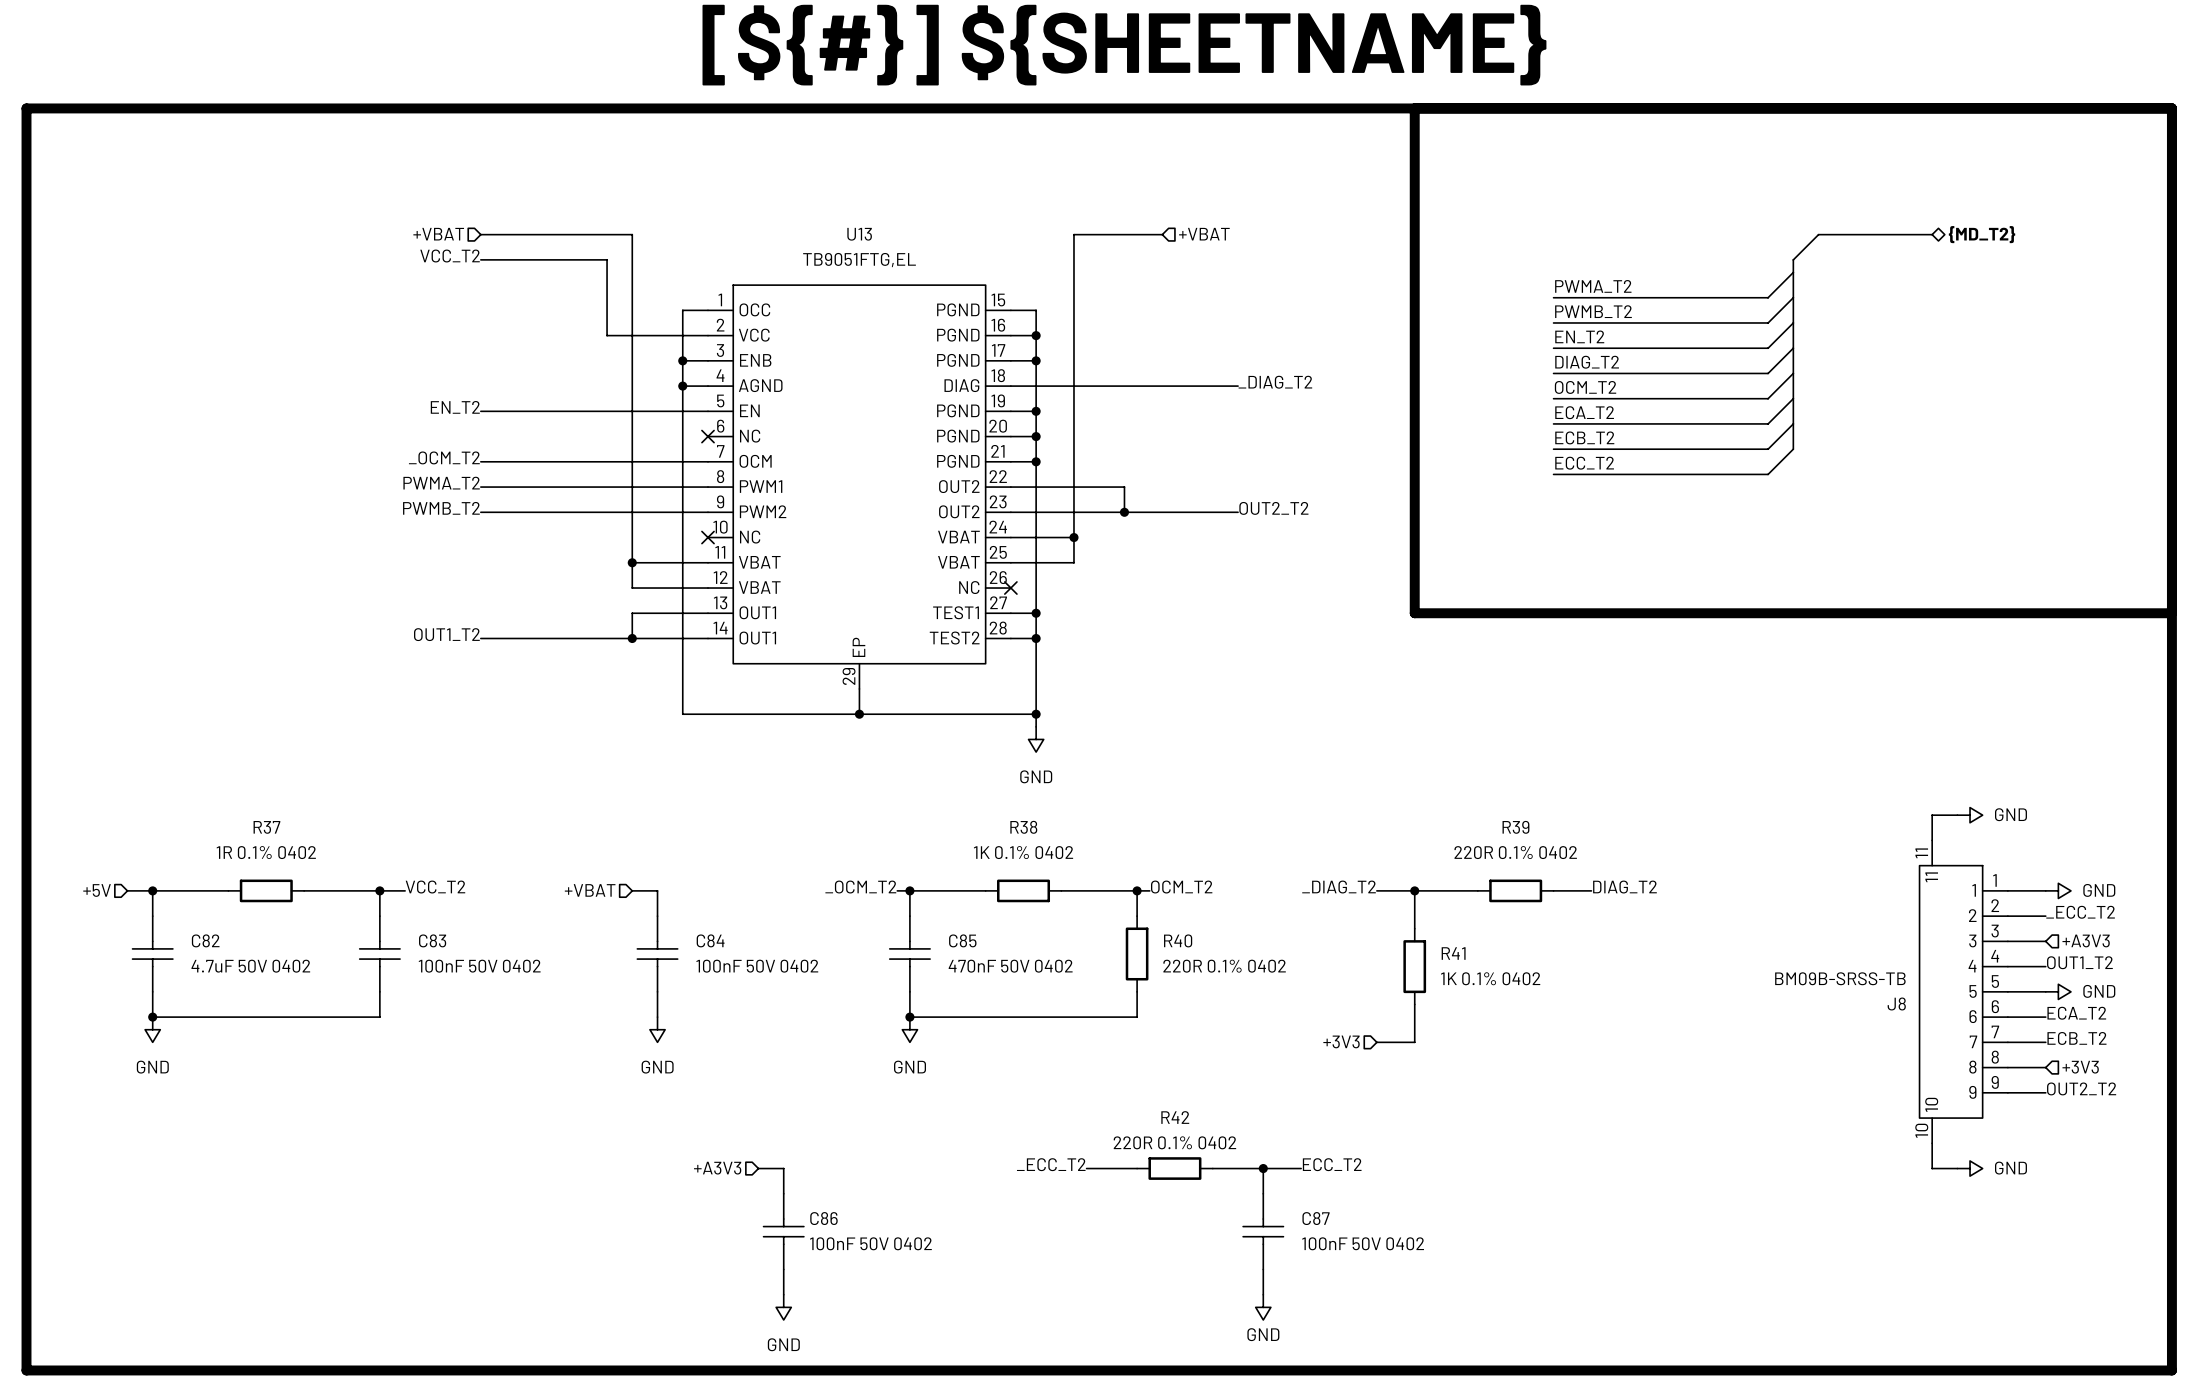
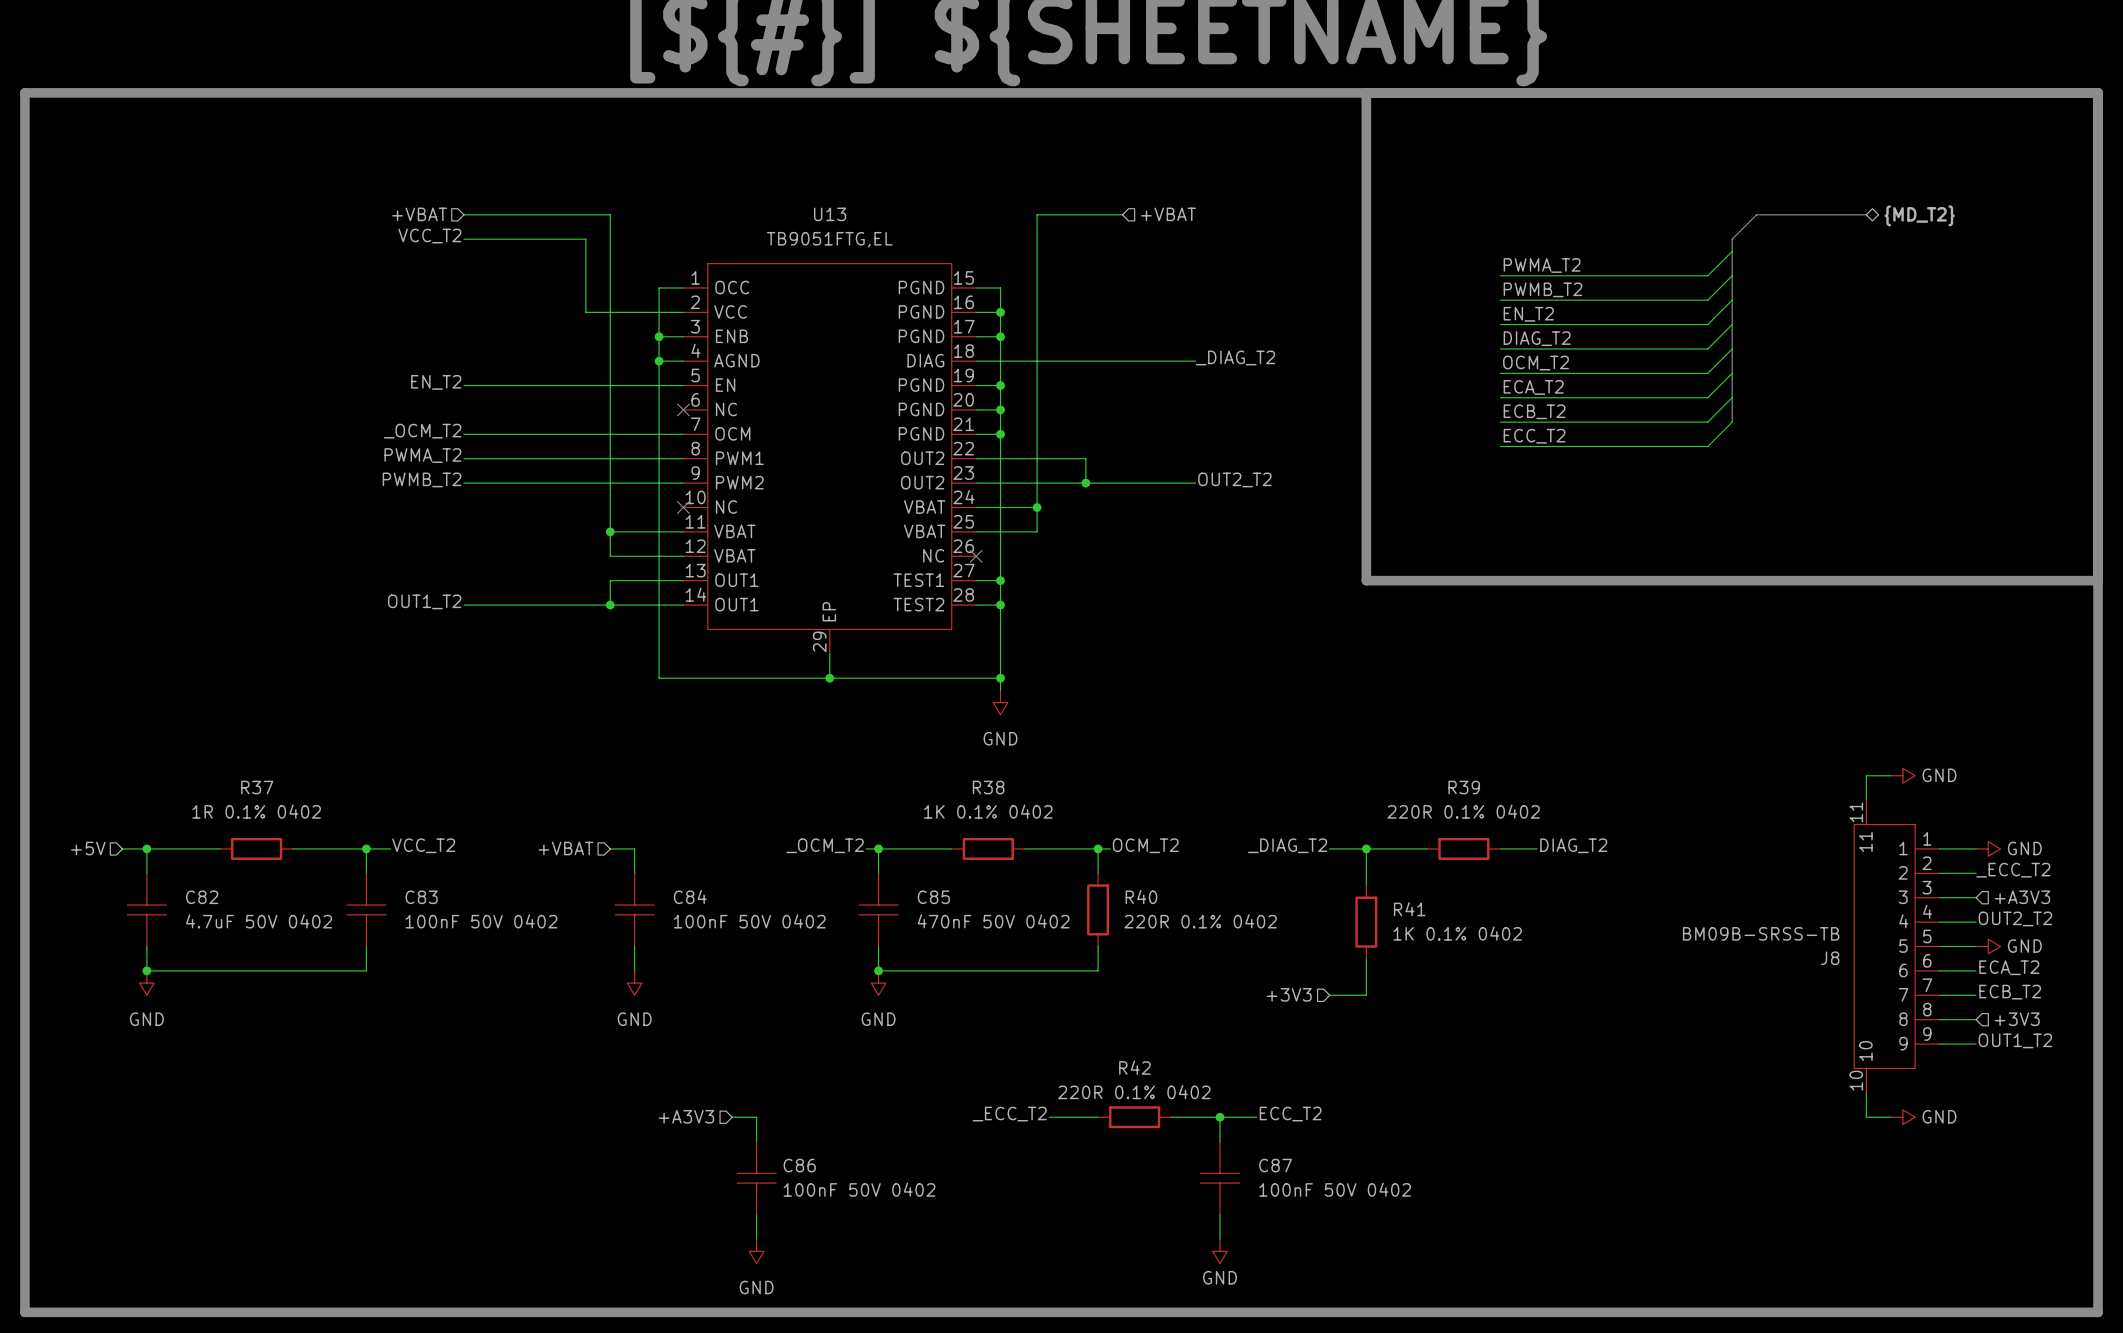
label: OUT1_T2 (2079, 962) -> OUT2_T2 (2015, 918)
label: OUT2_T2 (2081, 1088) -> OUT1_T2 (2015, 1040)

